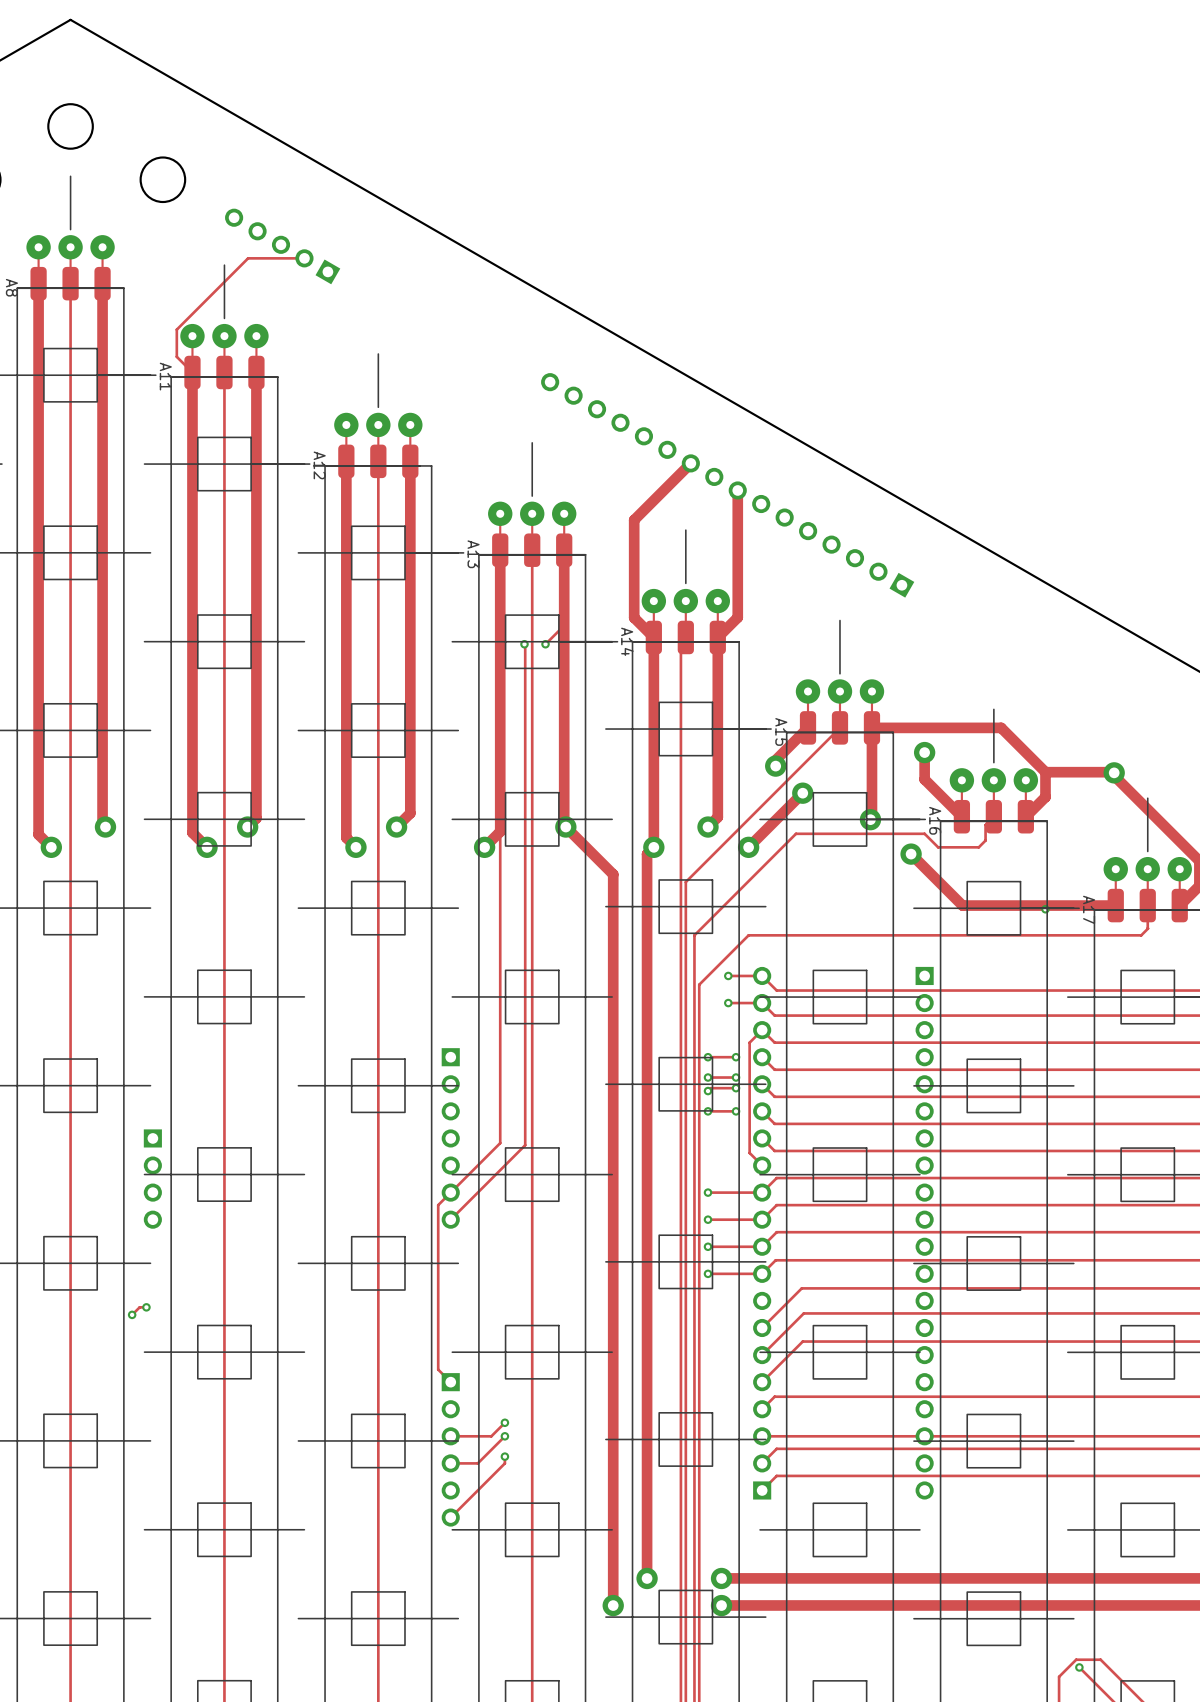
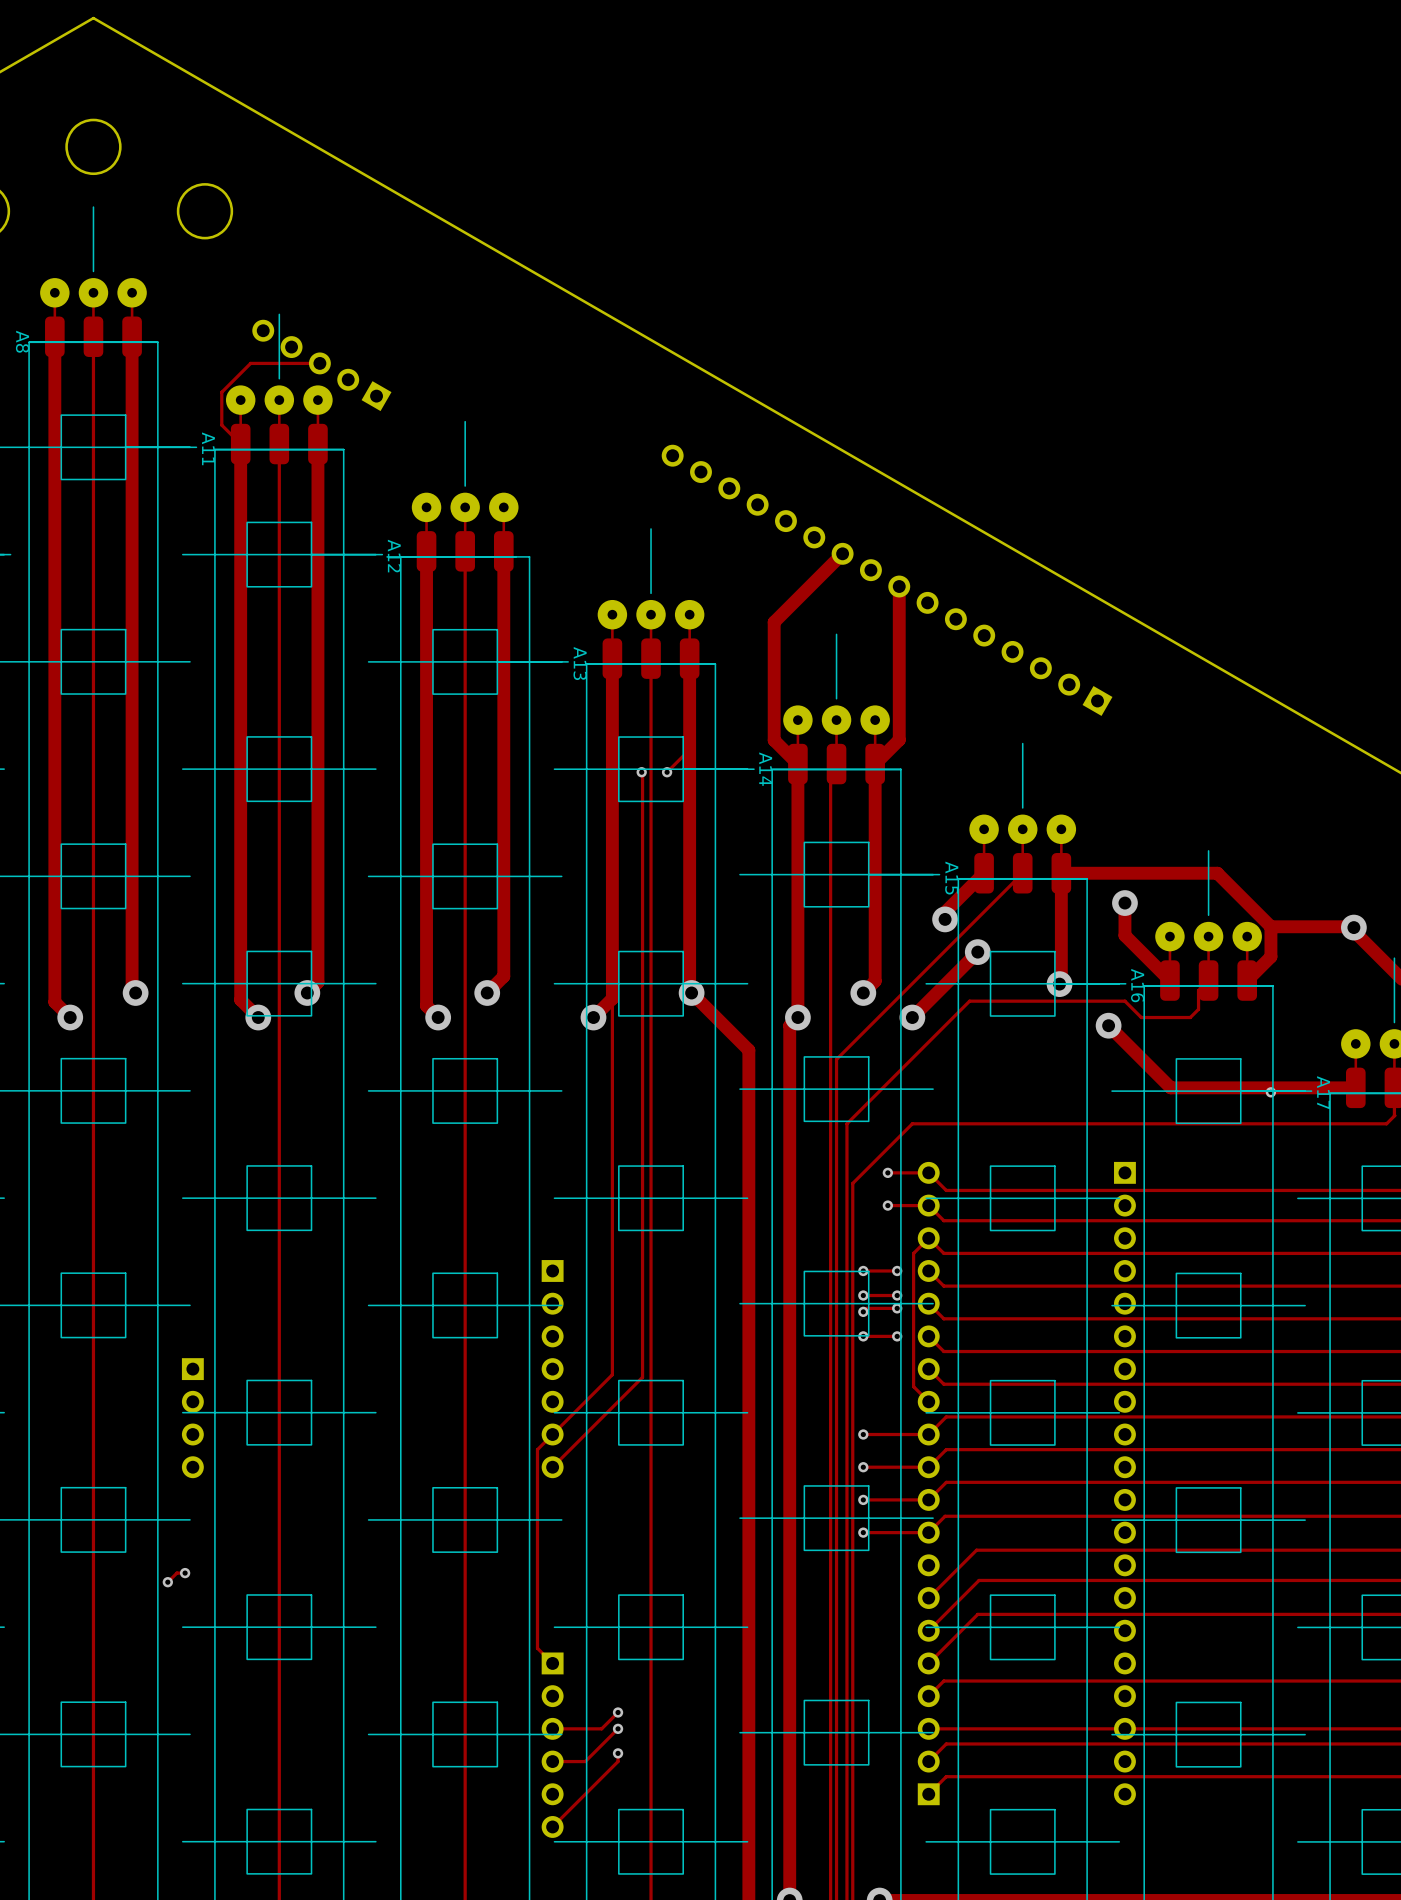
part position: (282, 246) -> (321, 365)
track: (304, 258) (248, 258) (200, 305) -> (319, 363) (250, 363)

